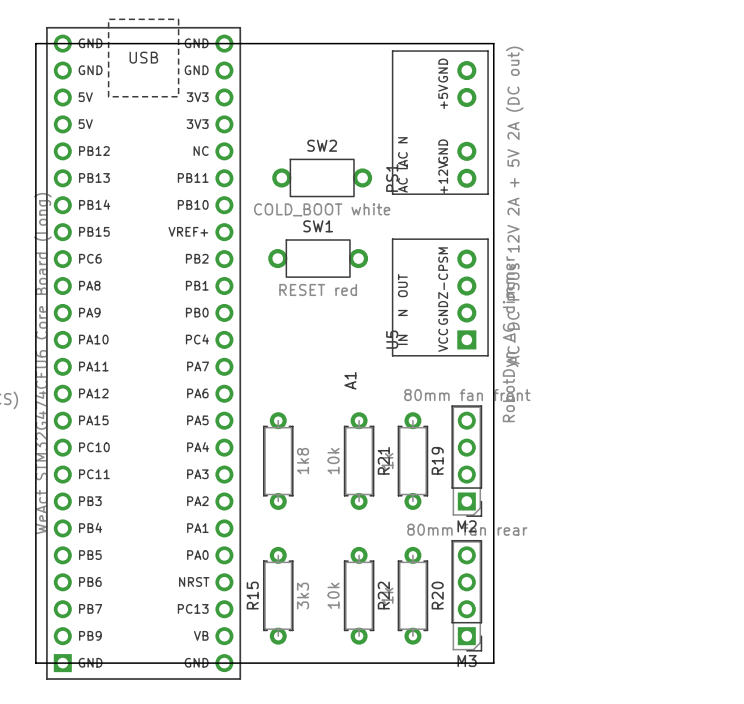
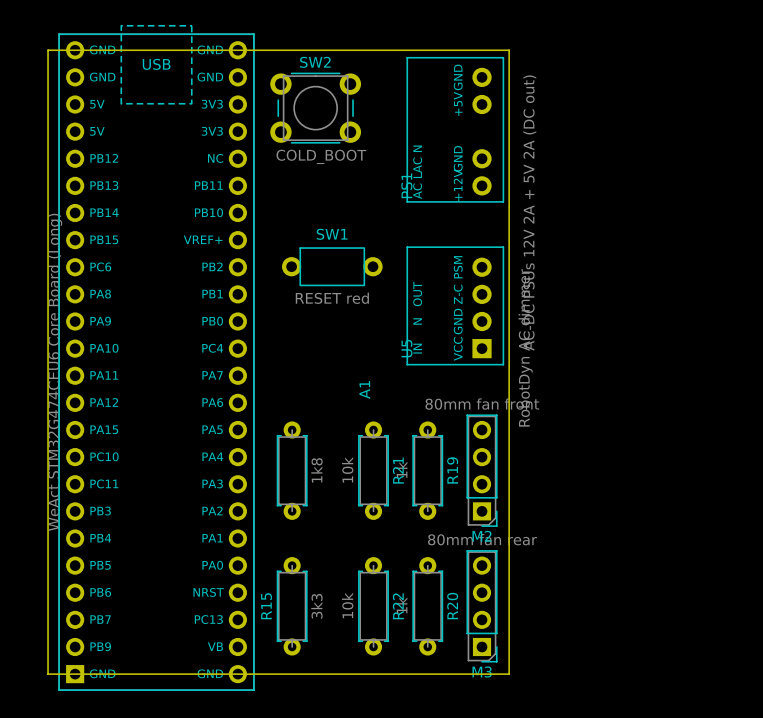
SW2 footprint: [272, 158, 373, 198] -> [270, 72, 362, 144]
SW2 value: COLD_BOOT white (322, 209) -> COLD_BOOT (321, 156)

